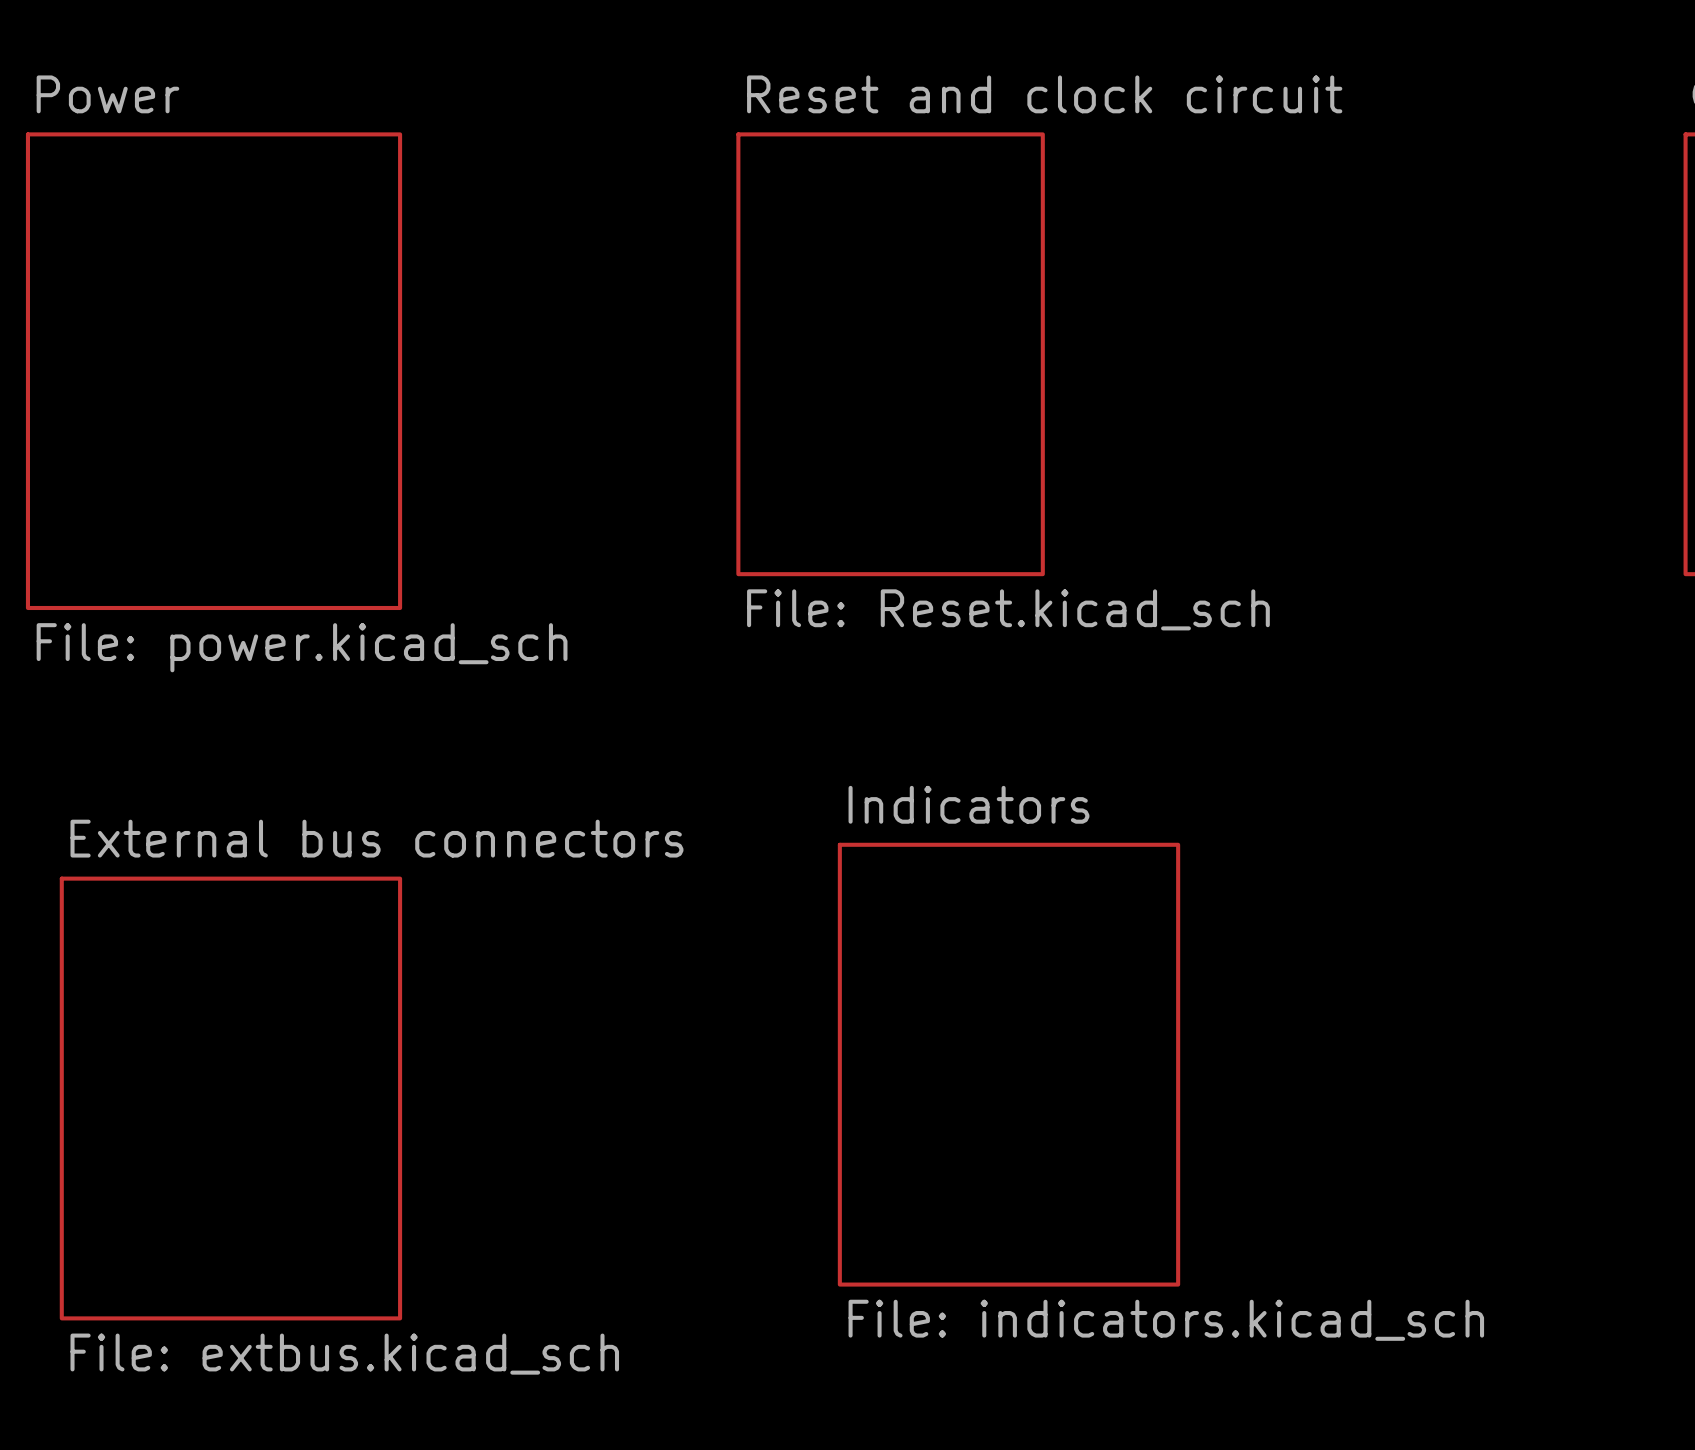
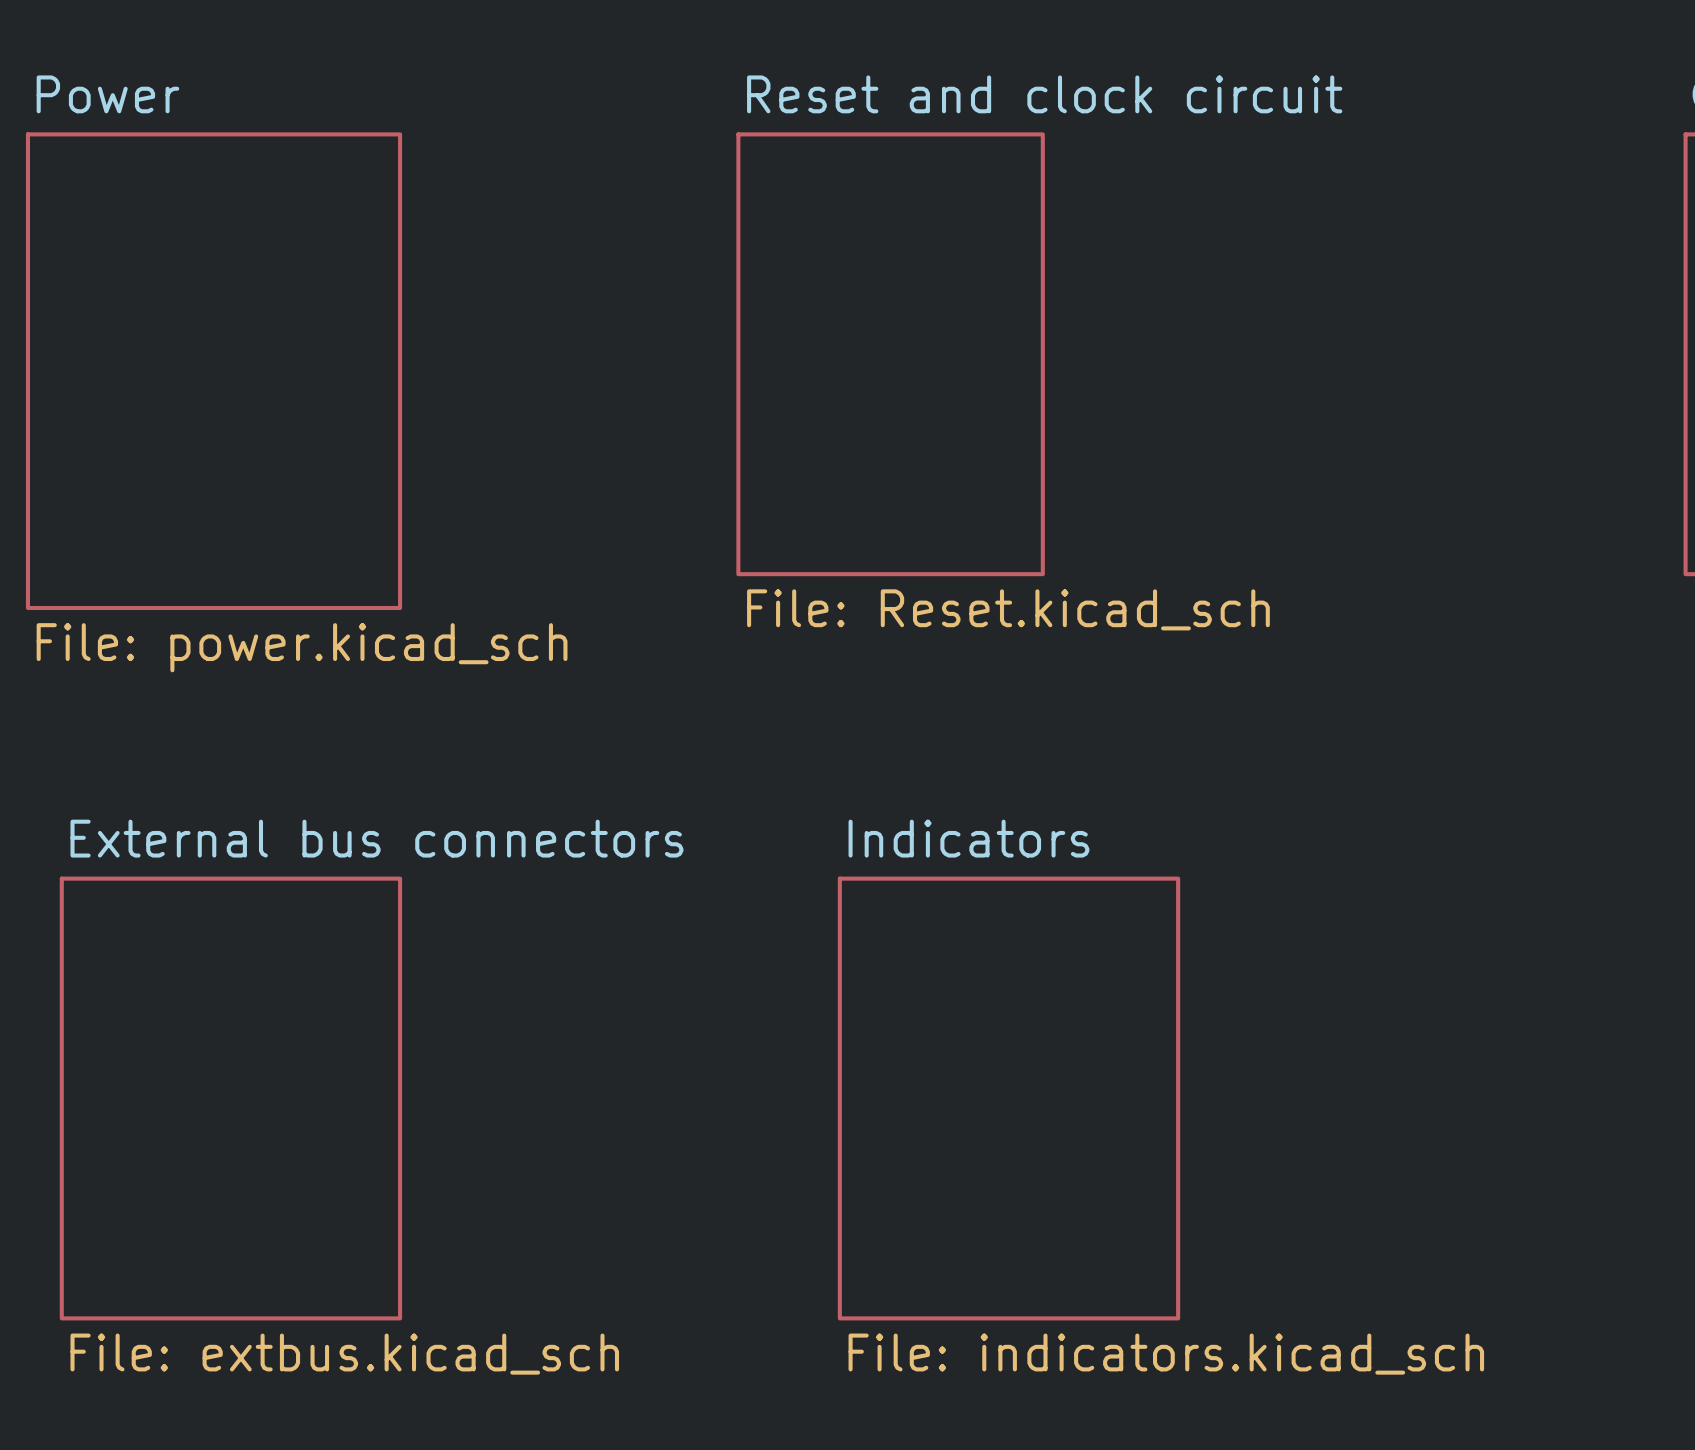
sheet Indicators position: (1008, 1064) -> (1008, 1098)

